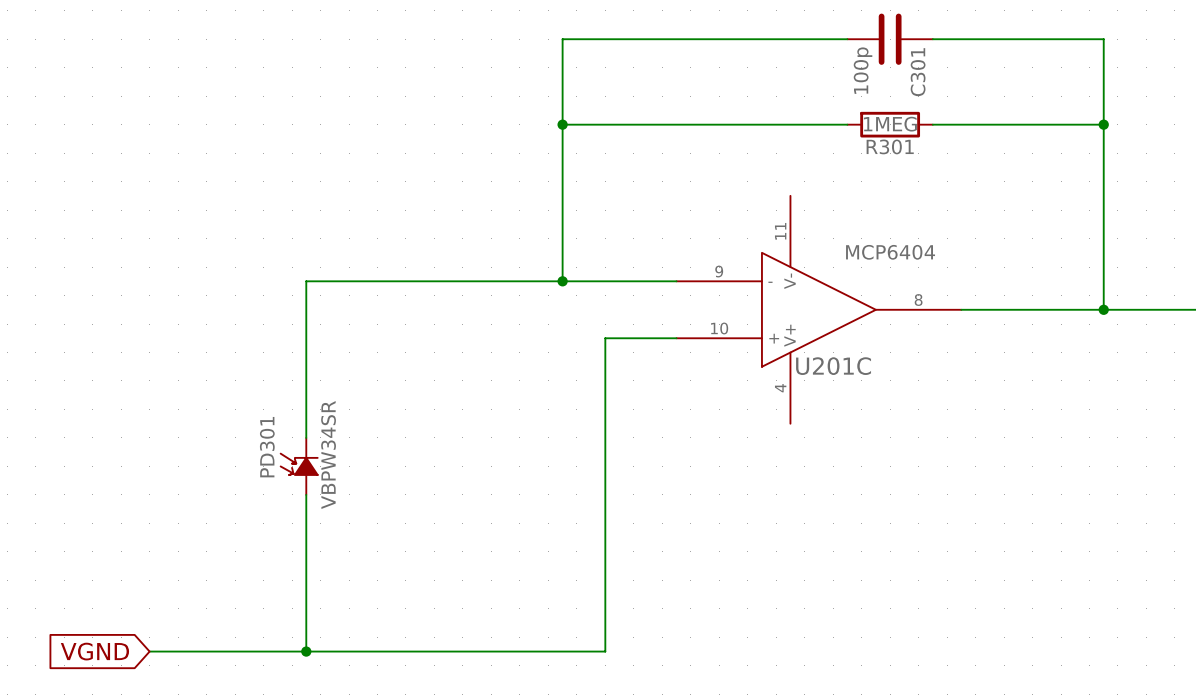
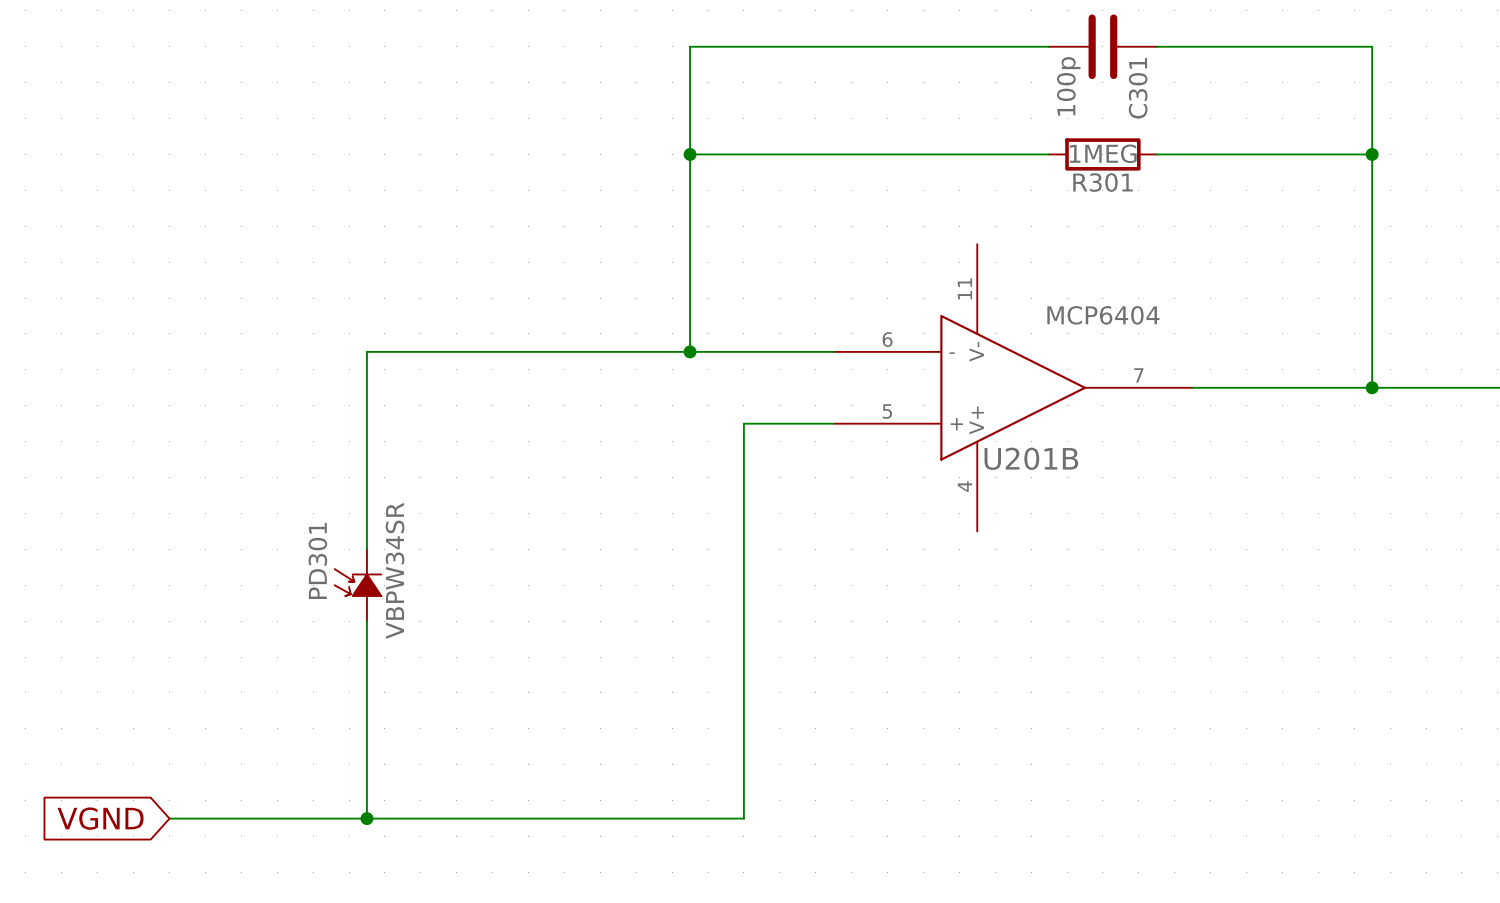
U201C pin number: 9 (719, 271) -> 6 (887, 339)
U201C pin number: 8 (918, 300) -> 7 (1138, 375)
U201C pin number: 10 (719, 328) -> 5 (887, 411)
U201C name: U201C (833, 366) -> U201B (1031, 458)

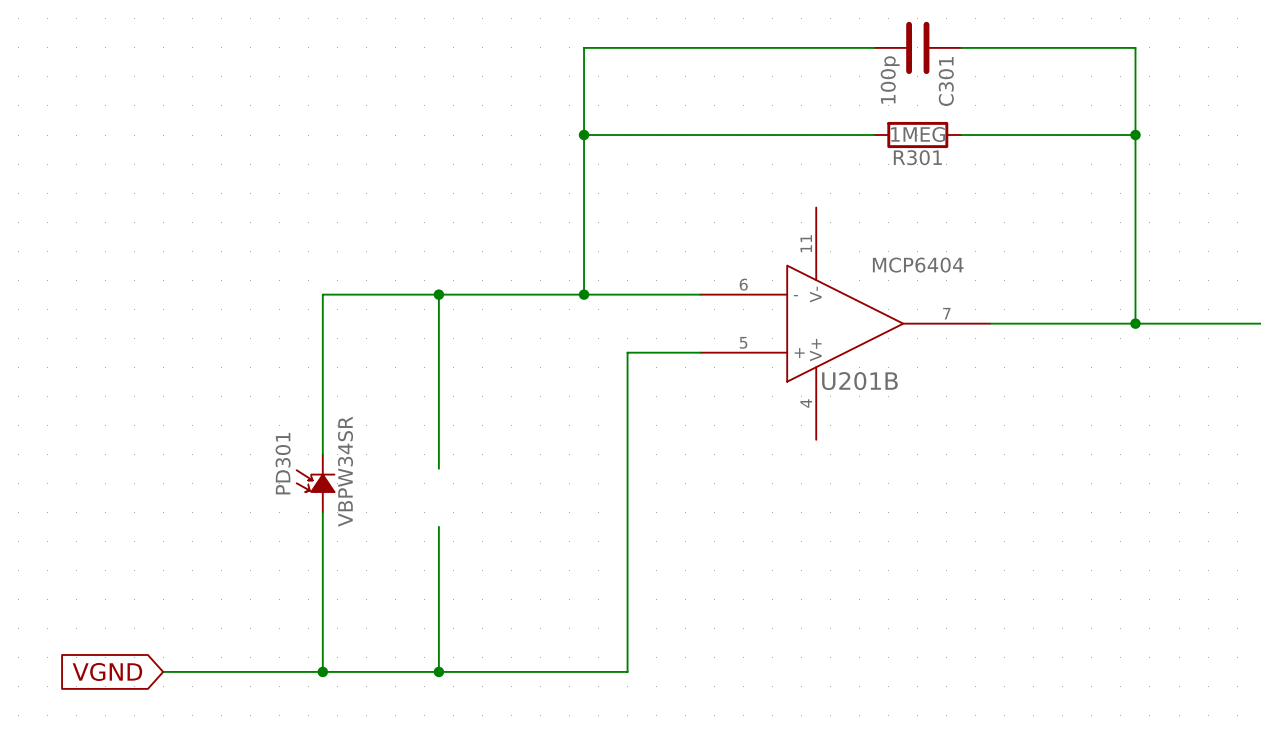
wire: none -> (438, 294) (438, 468)
junction: none -> (438, 294)
wire: none -> (438, 526) (438, 671)
junction: none -> (438, 671)

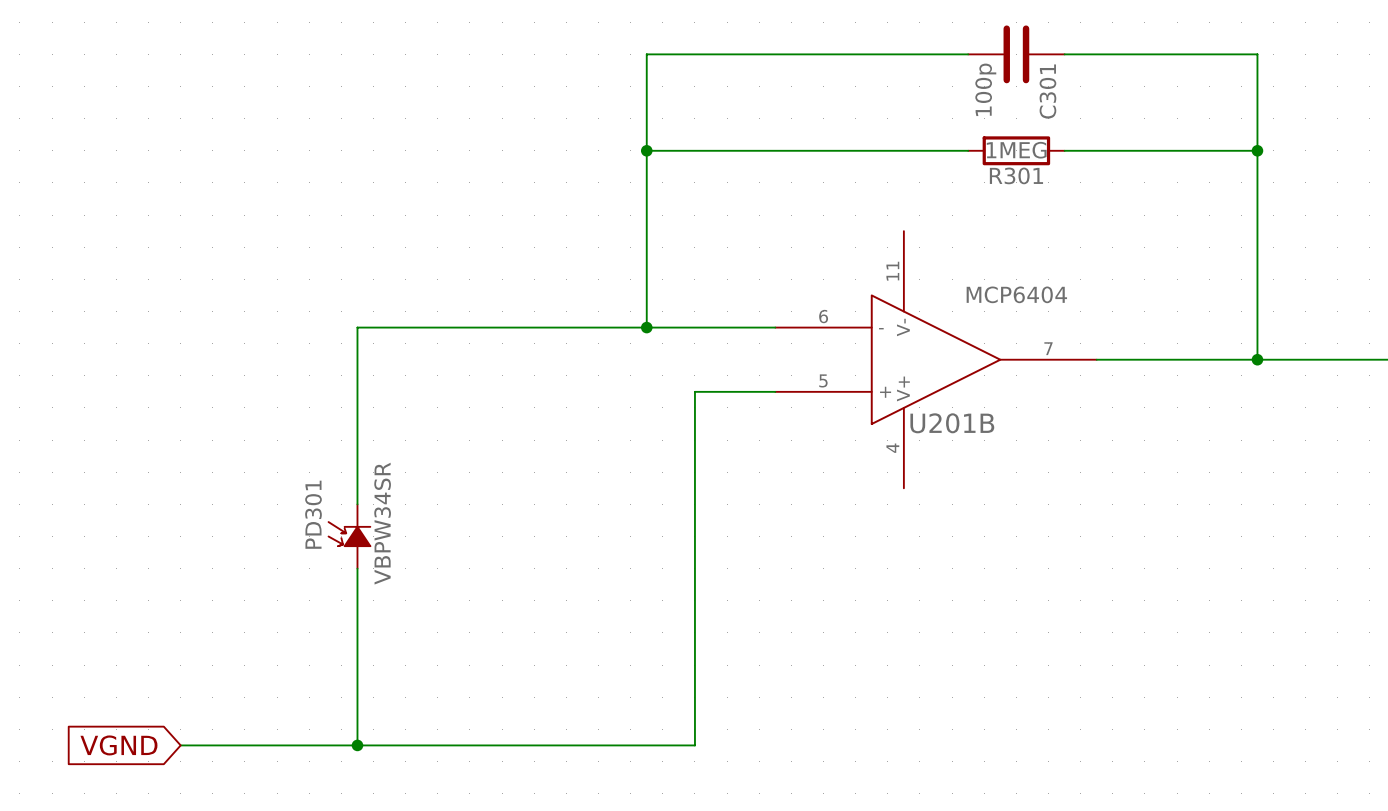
wire: (438, 294) (438, 468) -> none
junction: (438, 294) -> none
wire: (438, 526) (438, 671) -> none
junction: (438, 671) -> none

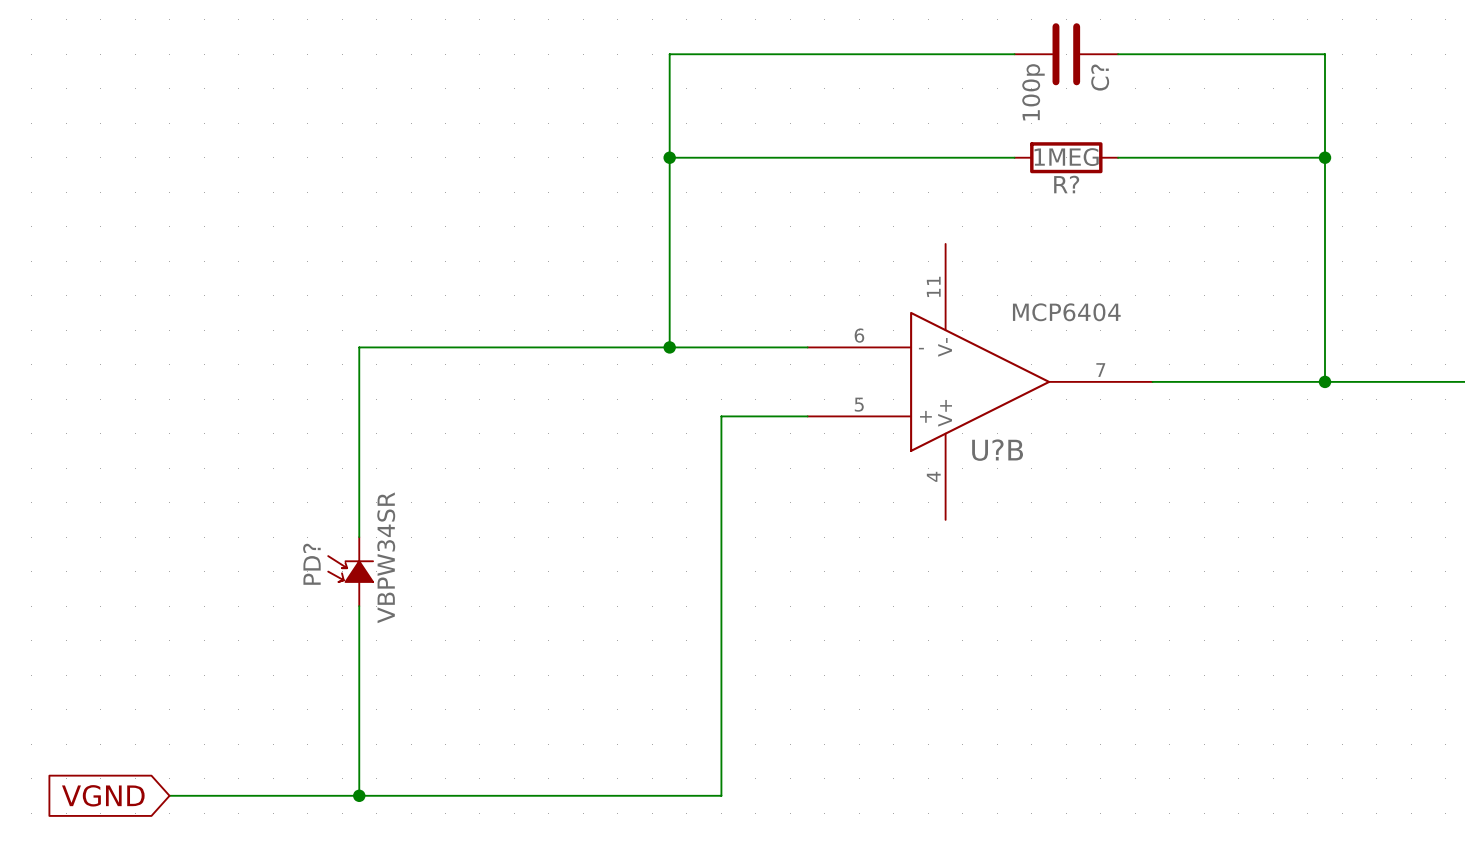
C301 name: C301 (1047, 91) -> C? (1100, 77)
R301 name: R301 (1016, 175) -> R? (1066, 184)
U201B name: U201B (952, 423) -> U?B (997, 450)
PD301 name: PD301 (313, 514) -> PD? (311, 564)

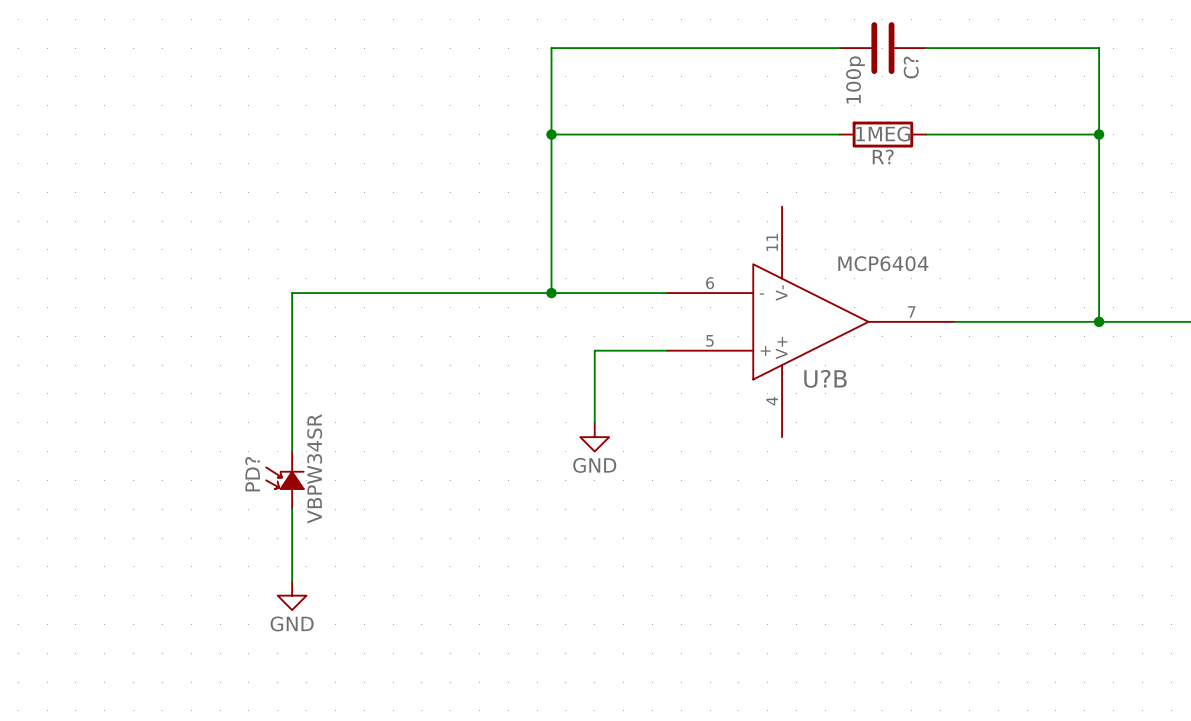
wire: (721, 502) (721, 795) (169, 795) -> none
power symbol: none -> GND (594, 437)
wire: (359, 692) (359, 795) -> none
power symbol: none -> GND (292, 595)
global label: VGND (103, 795) -> none
junction: (359, 795) -> none

